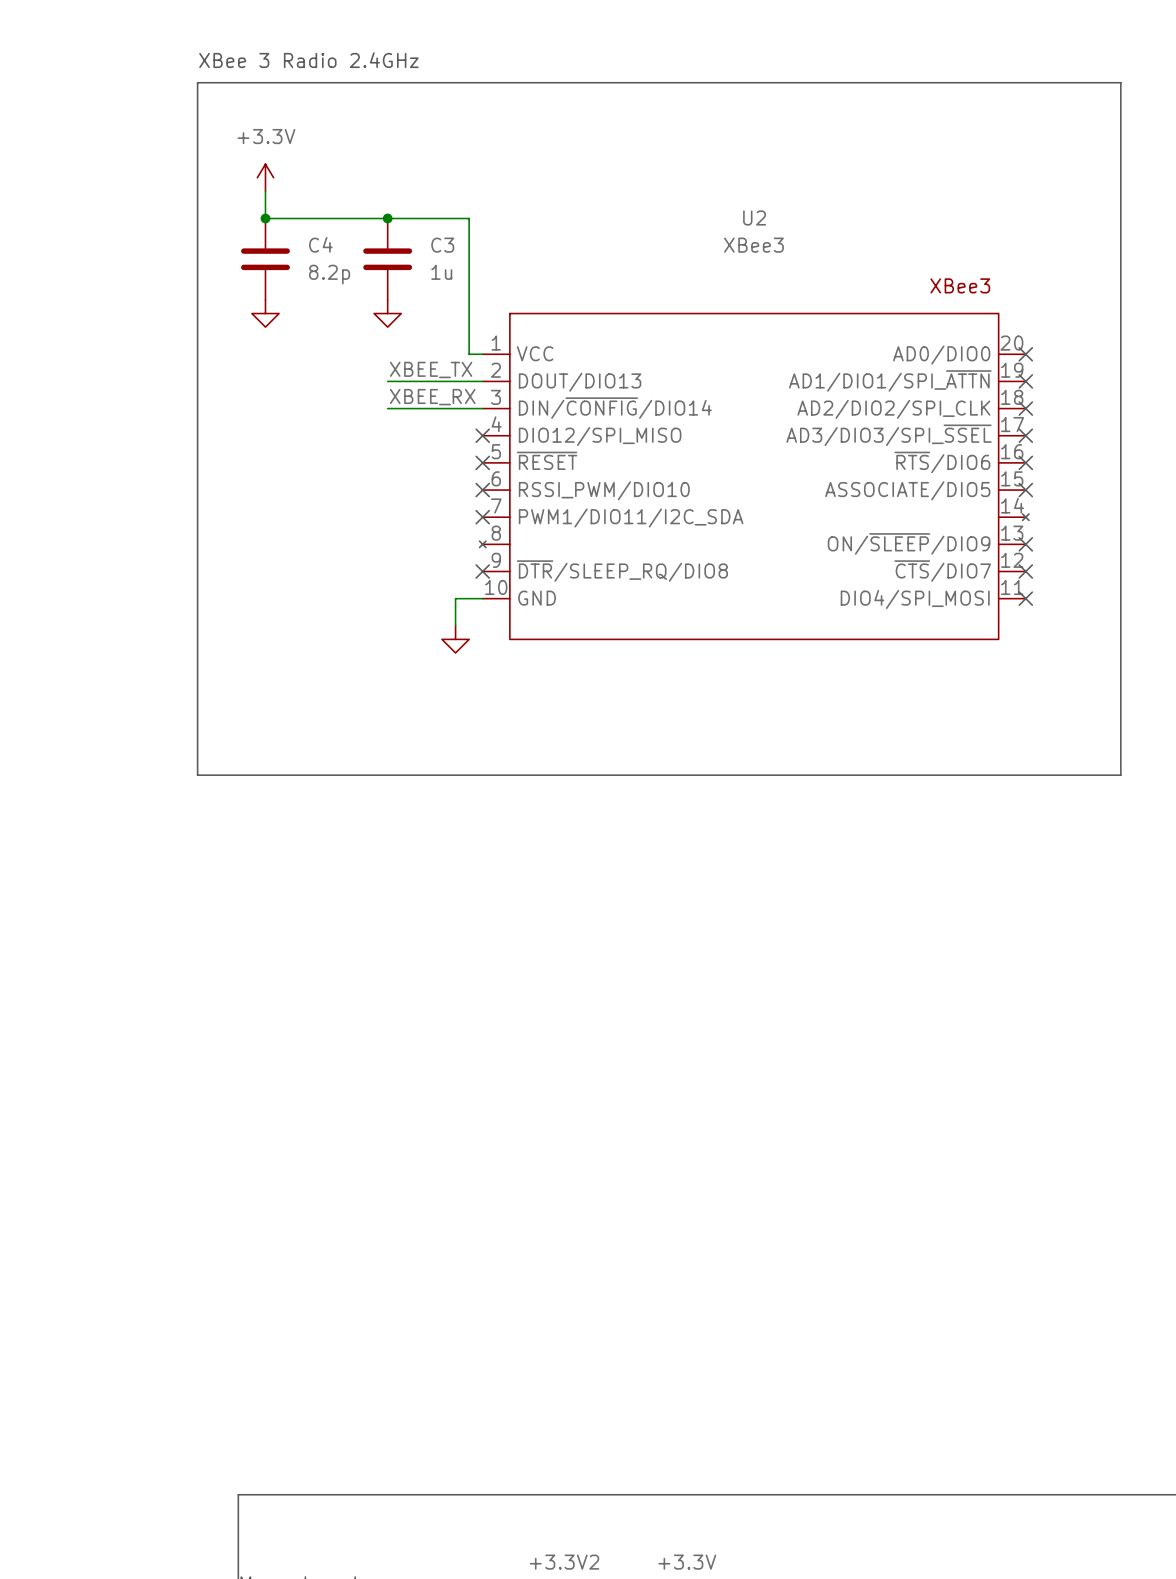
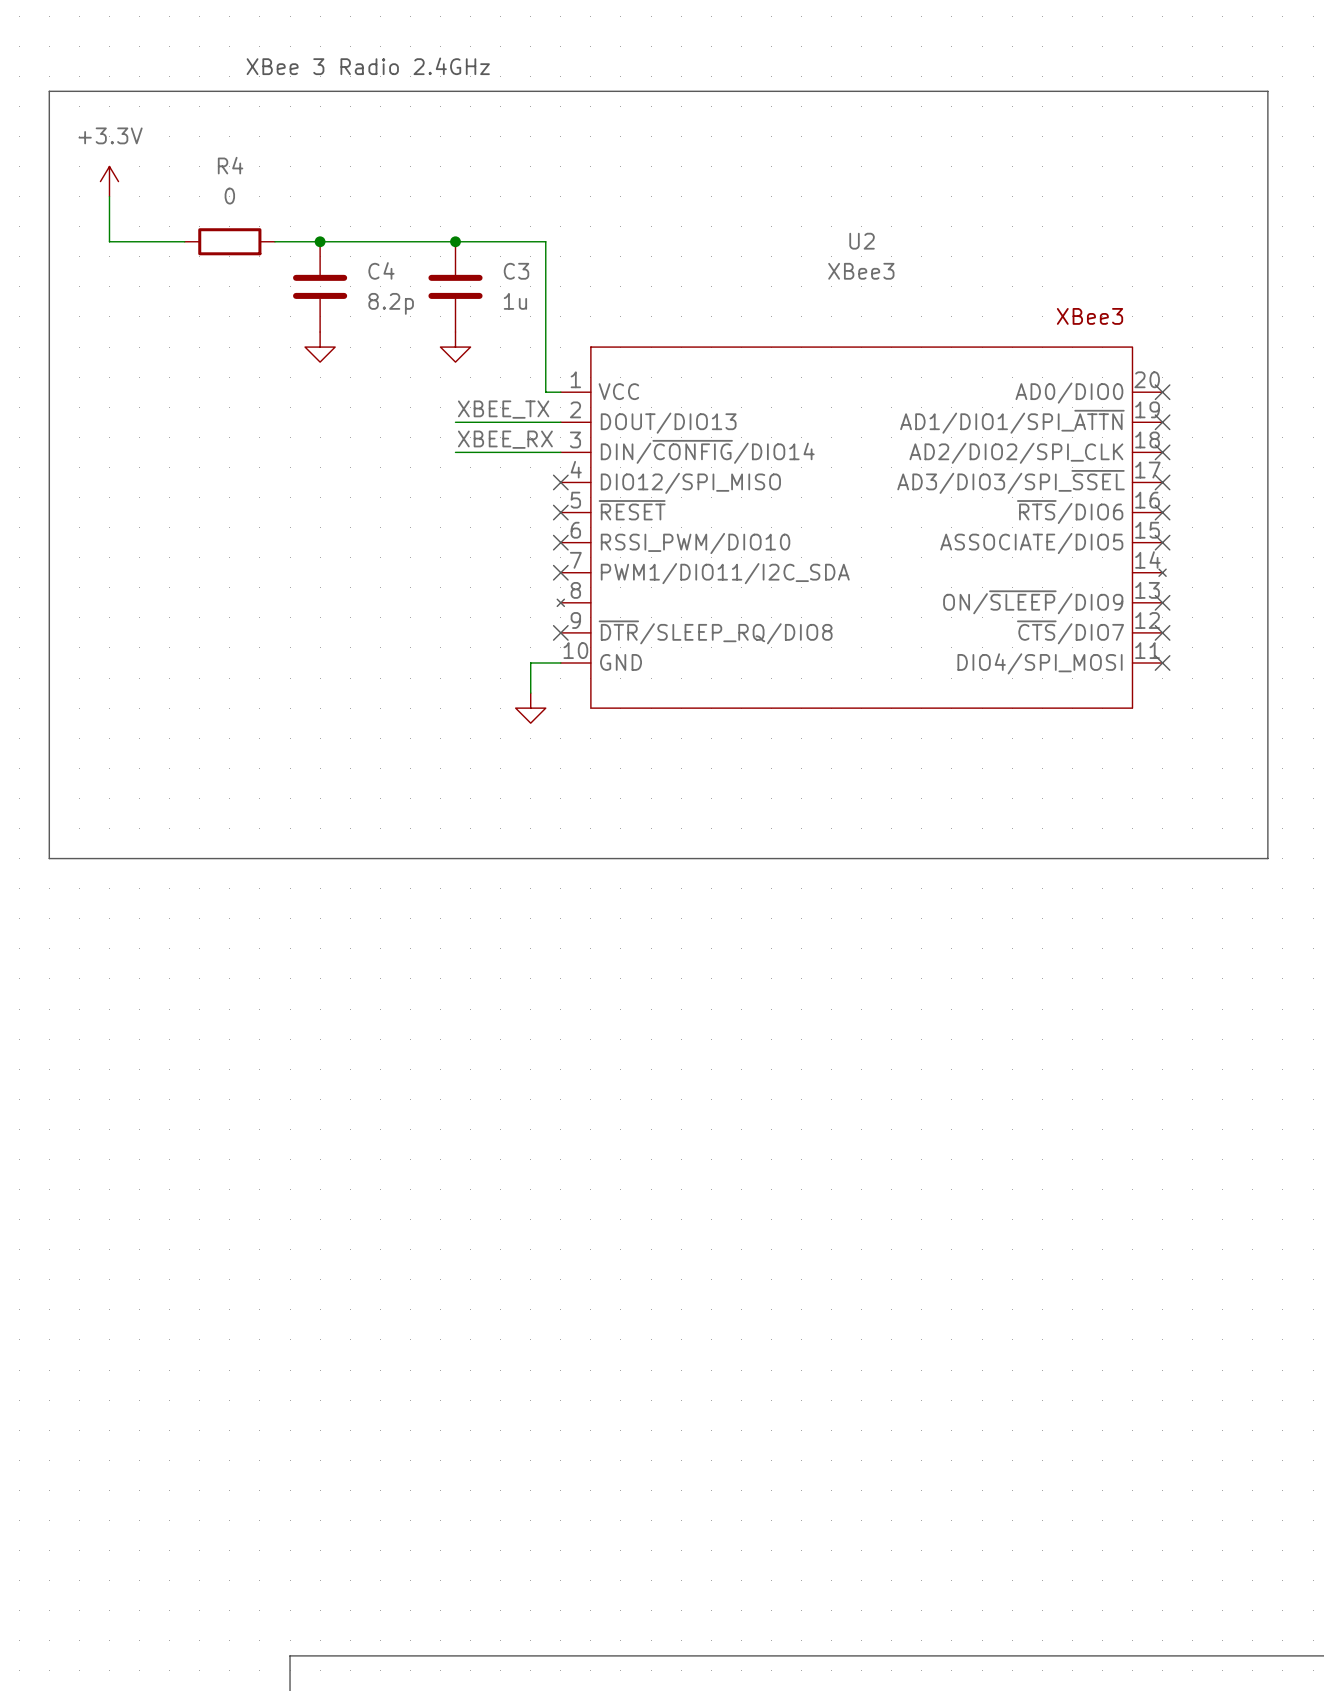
line: (197, 82) (197, 775) -> (244, 91) (49, 91) (49, 858) (244, 858)
wire: none -> (109, 196) (109, 241) (184, 241)
power symbol position: +3.3V (265, 177) -> +3.3V (109, 181)
wire: (265, 191) (265, 218) -> (274, 241) (320, 241)
R4: none -> 0 (229, 241)

